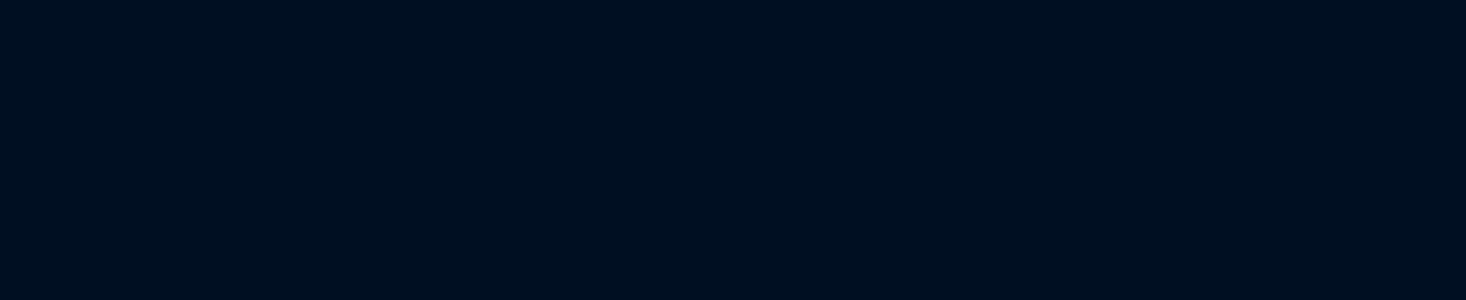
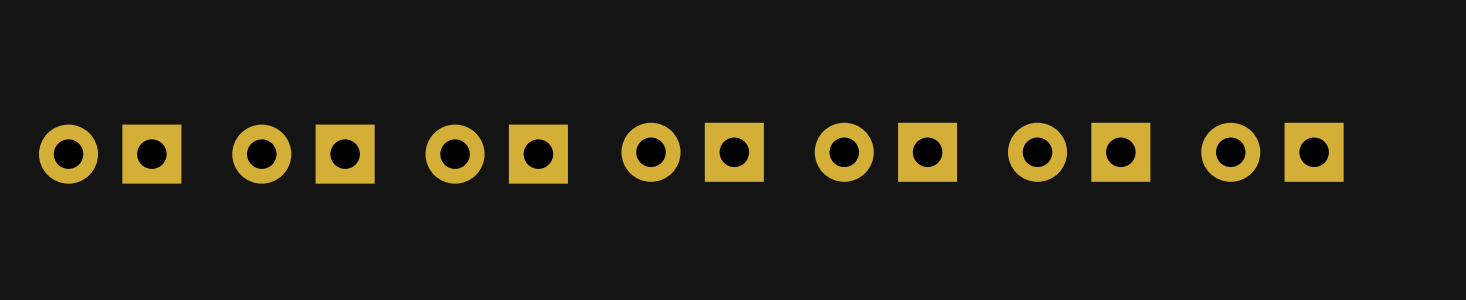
part: none -> (692, 152)
part: none -> (885, 152)
part: none -> (1079, 152)
part: none -> (1272, 152)
part: none -> (110, 154)
part: none -> (303, 154)
part: none -> (496, 154)

